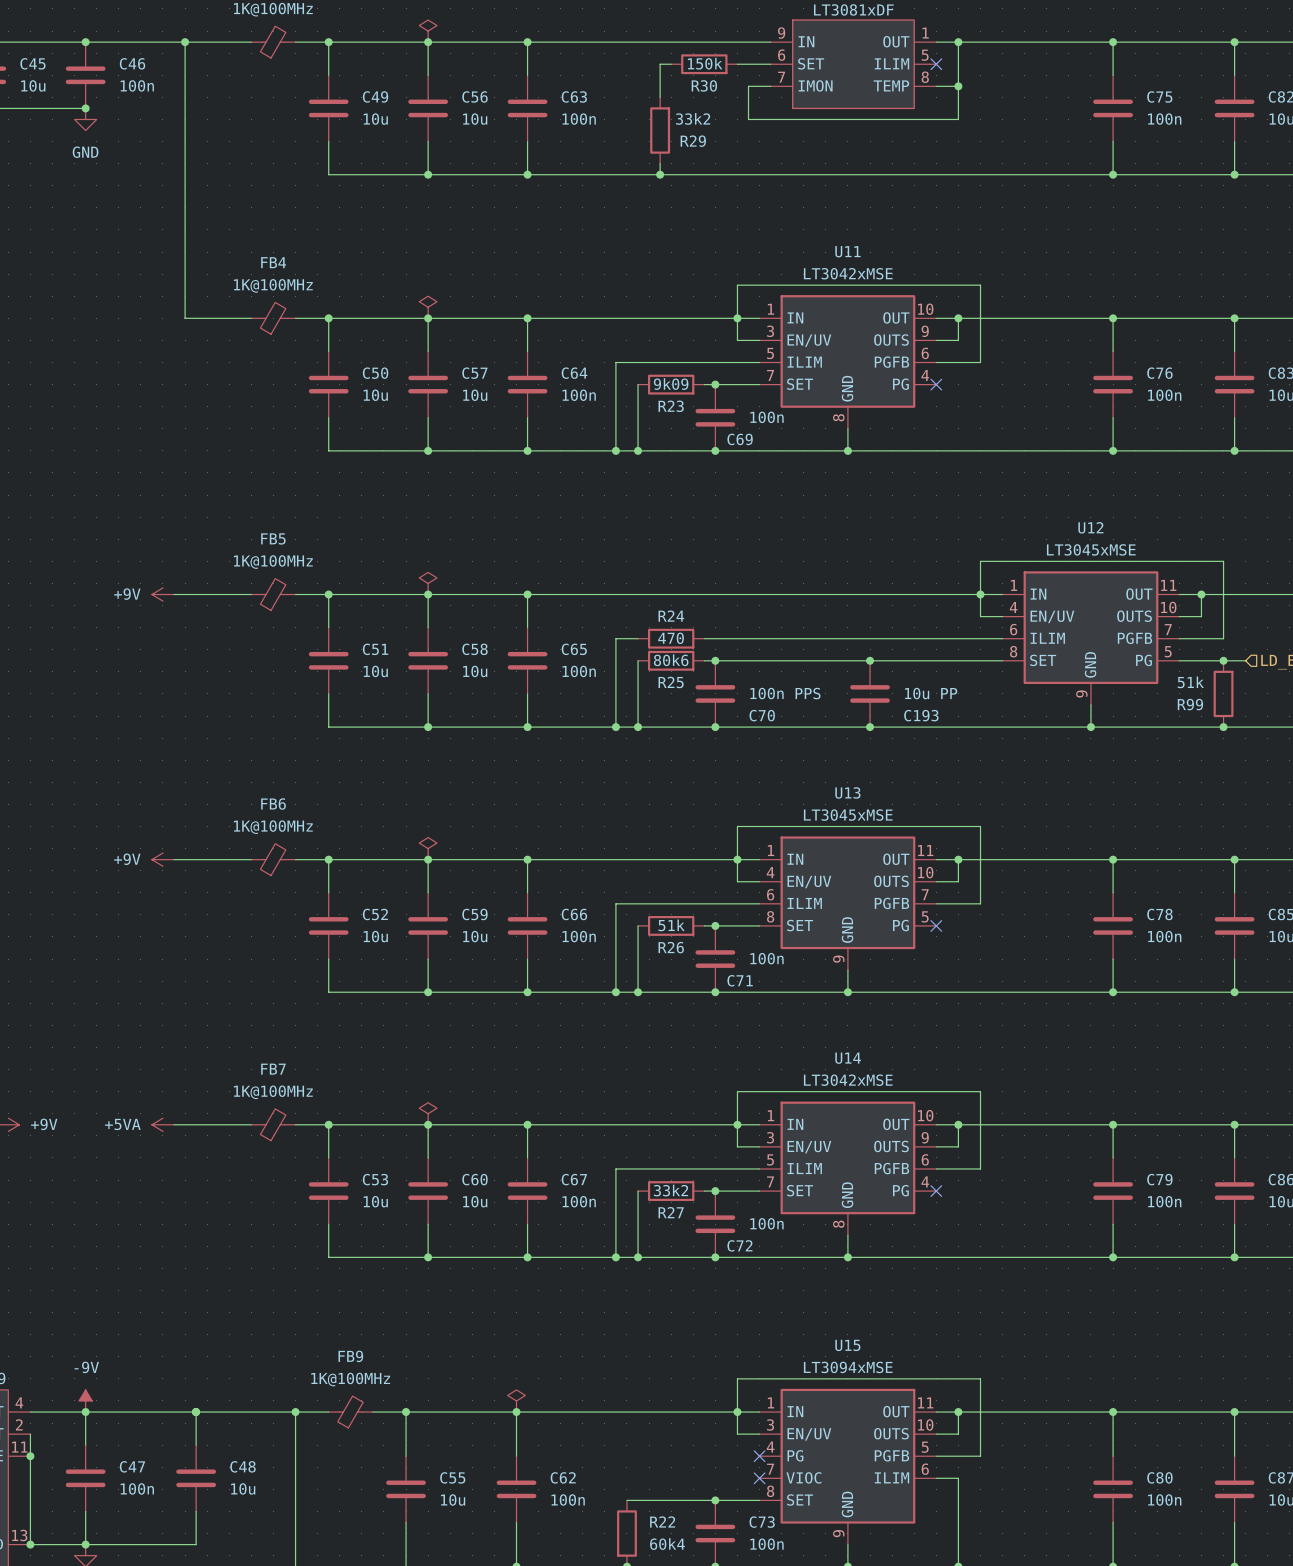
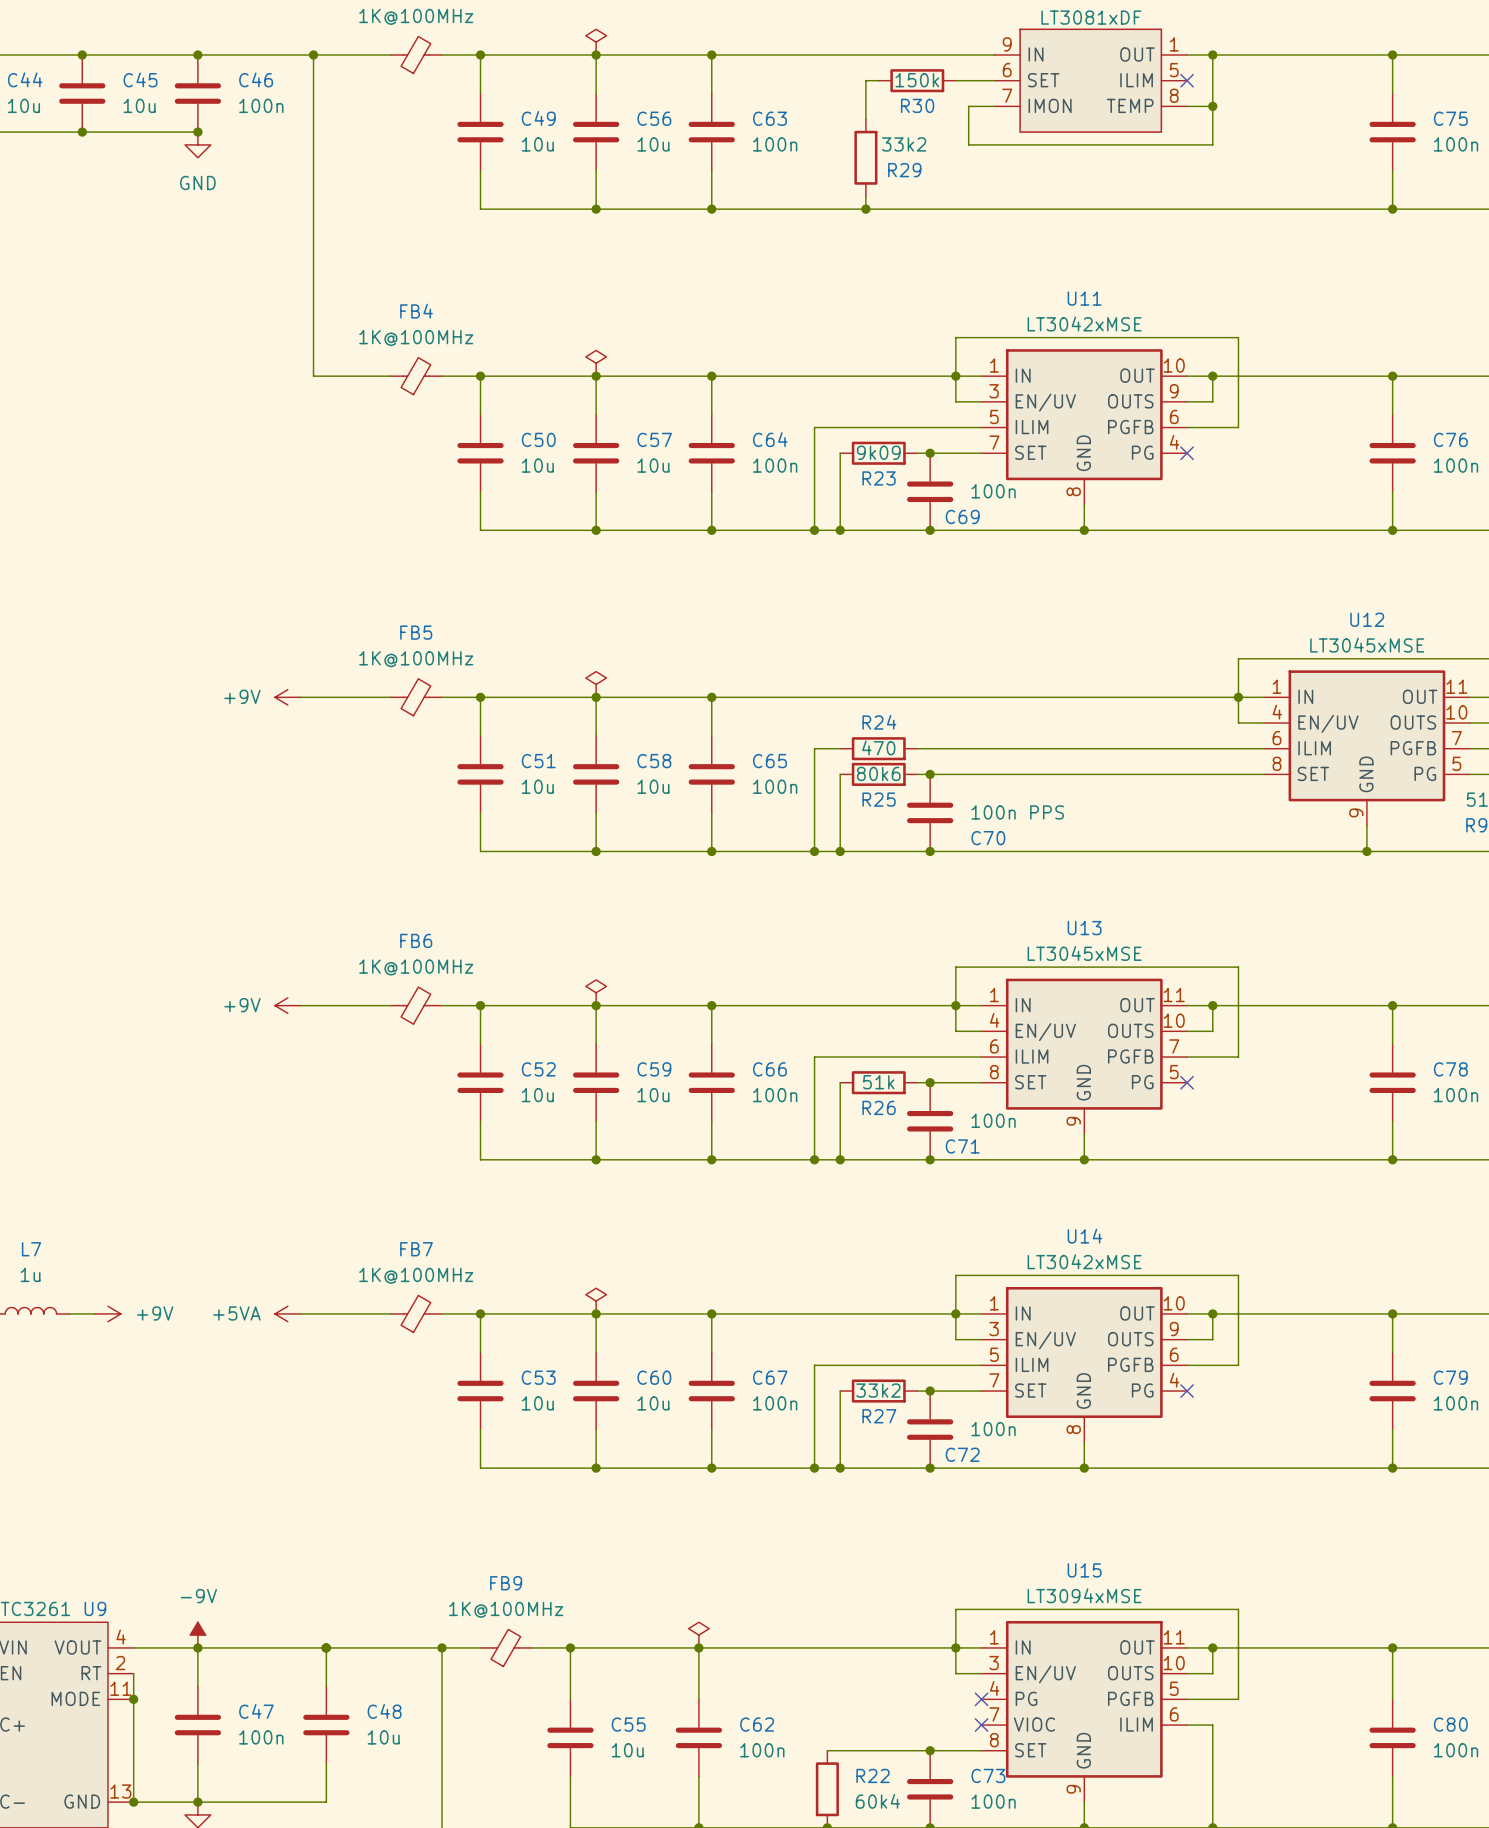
junction: (870, 660) -> none
C193: 10u PP (870, 693) -> none
junction: (870, 727) -> none

